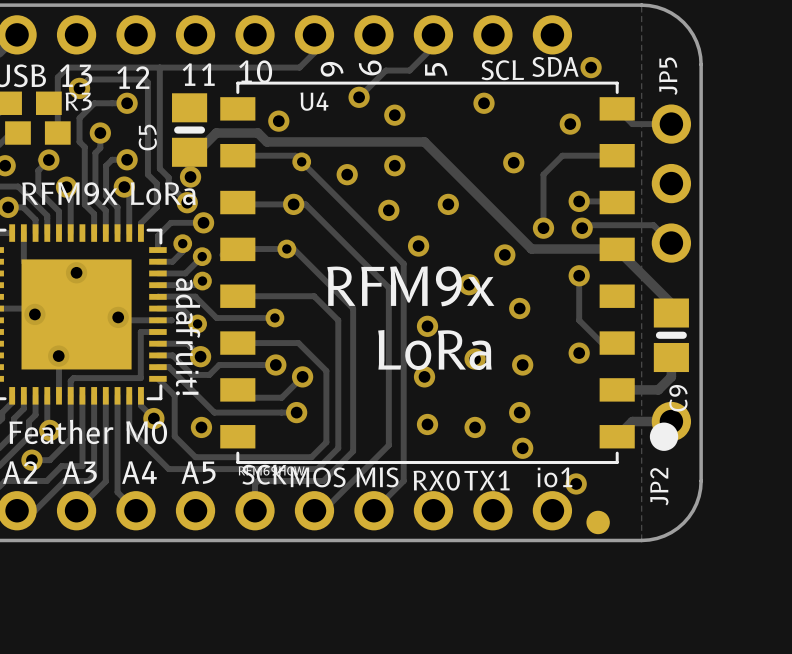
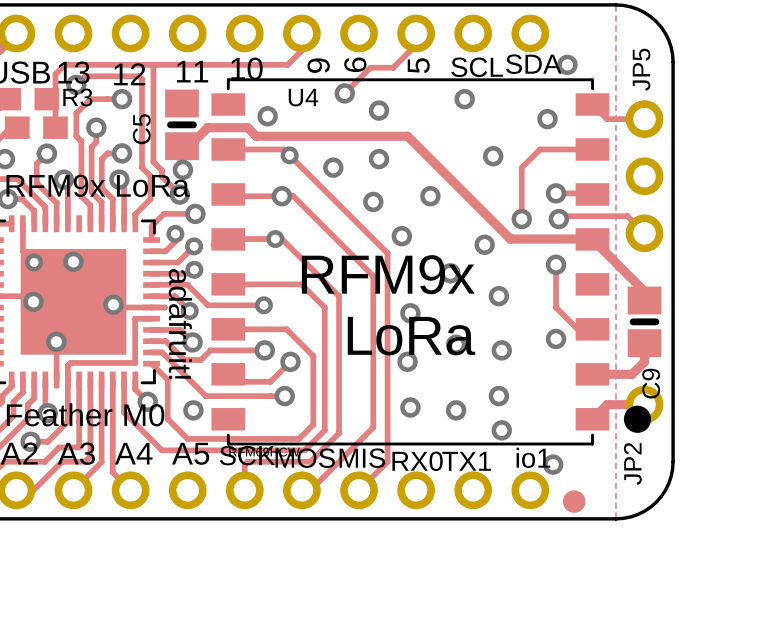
via: none -> (34, 262)

